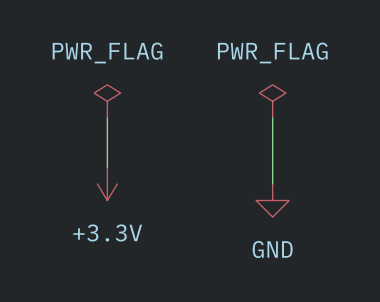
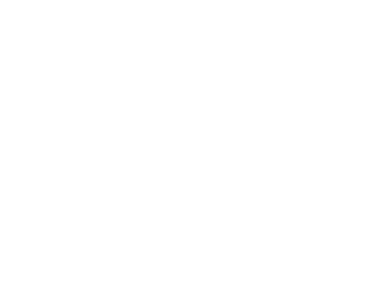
power symbol: PWR_FLAG (107, 101) -> none
power symbol: PWR_FLAG (272, 101) -> none
wire: (107, 117) (107, 167) -> none
wire: (272, 117) (272, 183) -> none
power symbol: +3.3V (107, 183) -> none
power symbol: GND (272, 200) -> none

